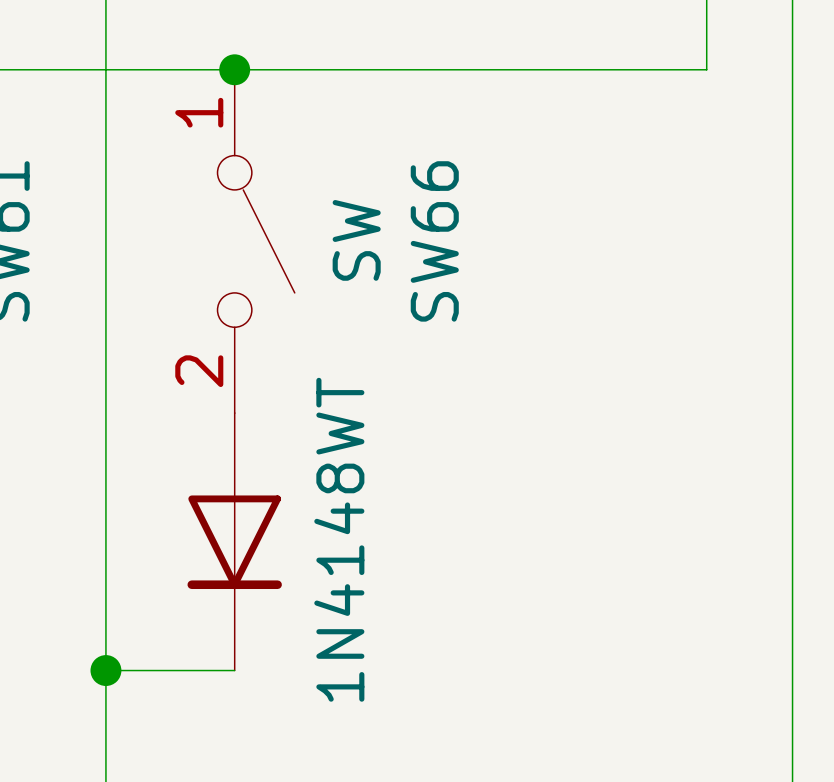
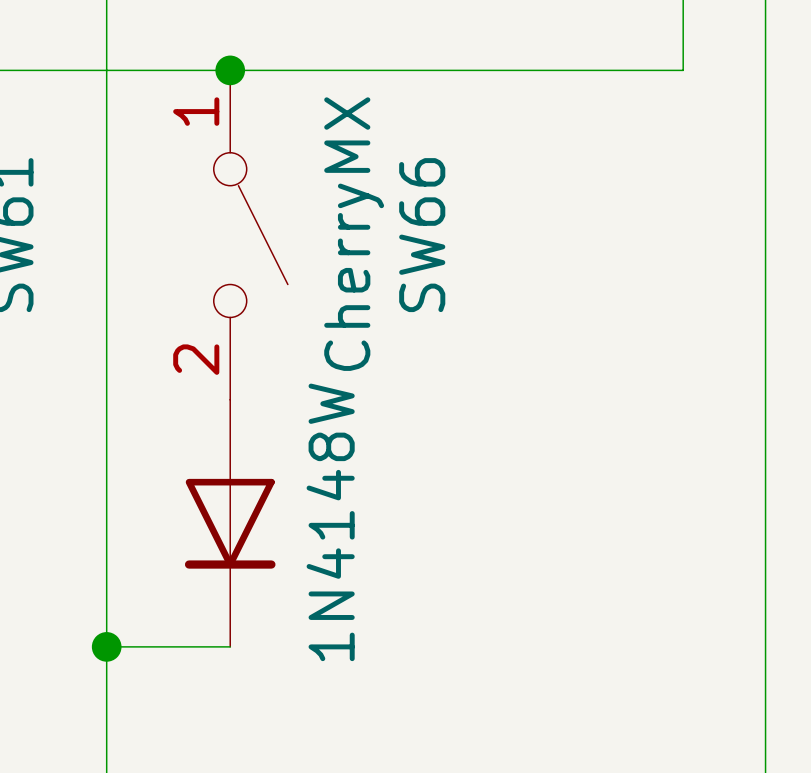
SW66 value: SW (356, 240) -> CherryMX (354, 234)
part value: 1N4148WT (339, 539) -> 1N4148W (330, 522)

